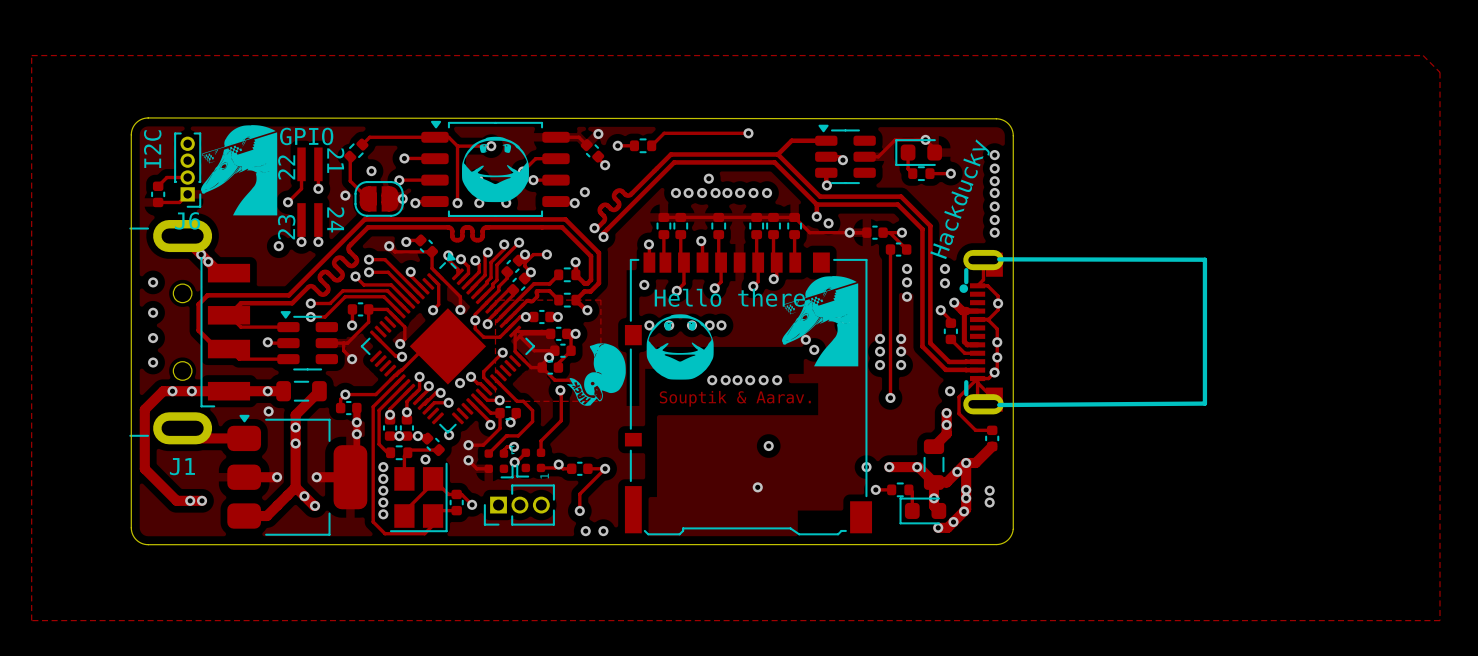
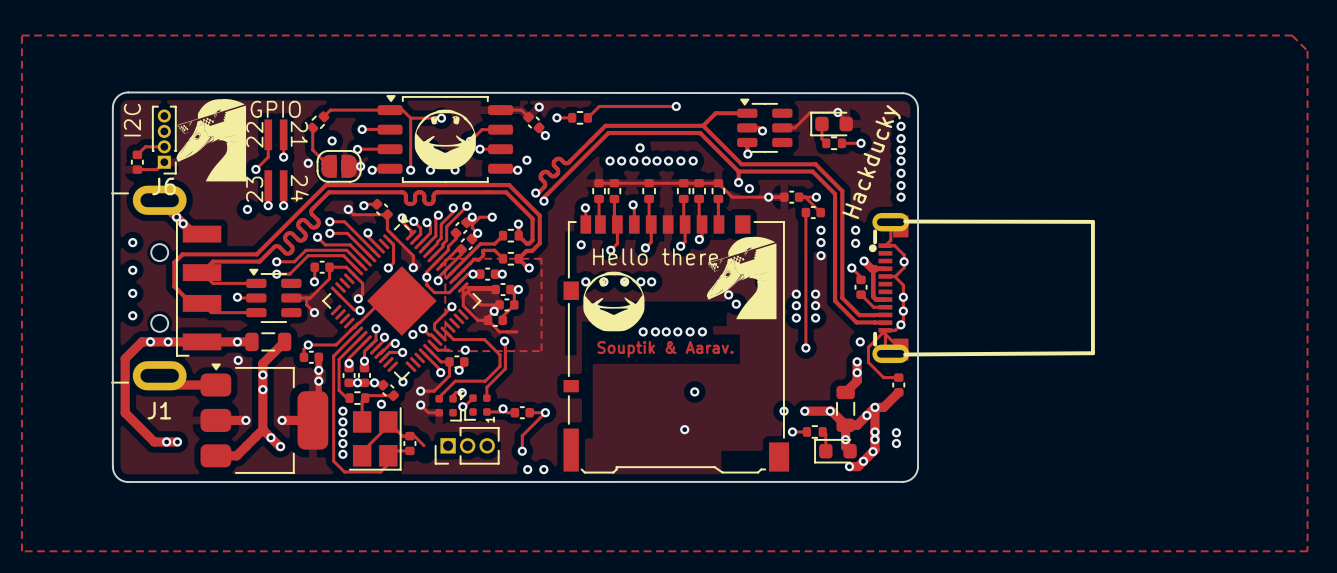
drawing: [567, 343, 626, 406] -> none
track: (504, 388) (517, 401) (523, 401) (532, 410) (532, 421) (518, 435) (506, 435) (488, 453) -> (453, 339) (484, 339) (499, 354) (499, 366) (485, 381) (455, 381) (439, 398)
via position: (499, 400) -> (465, 350)
via: (472, 504) -> none

